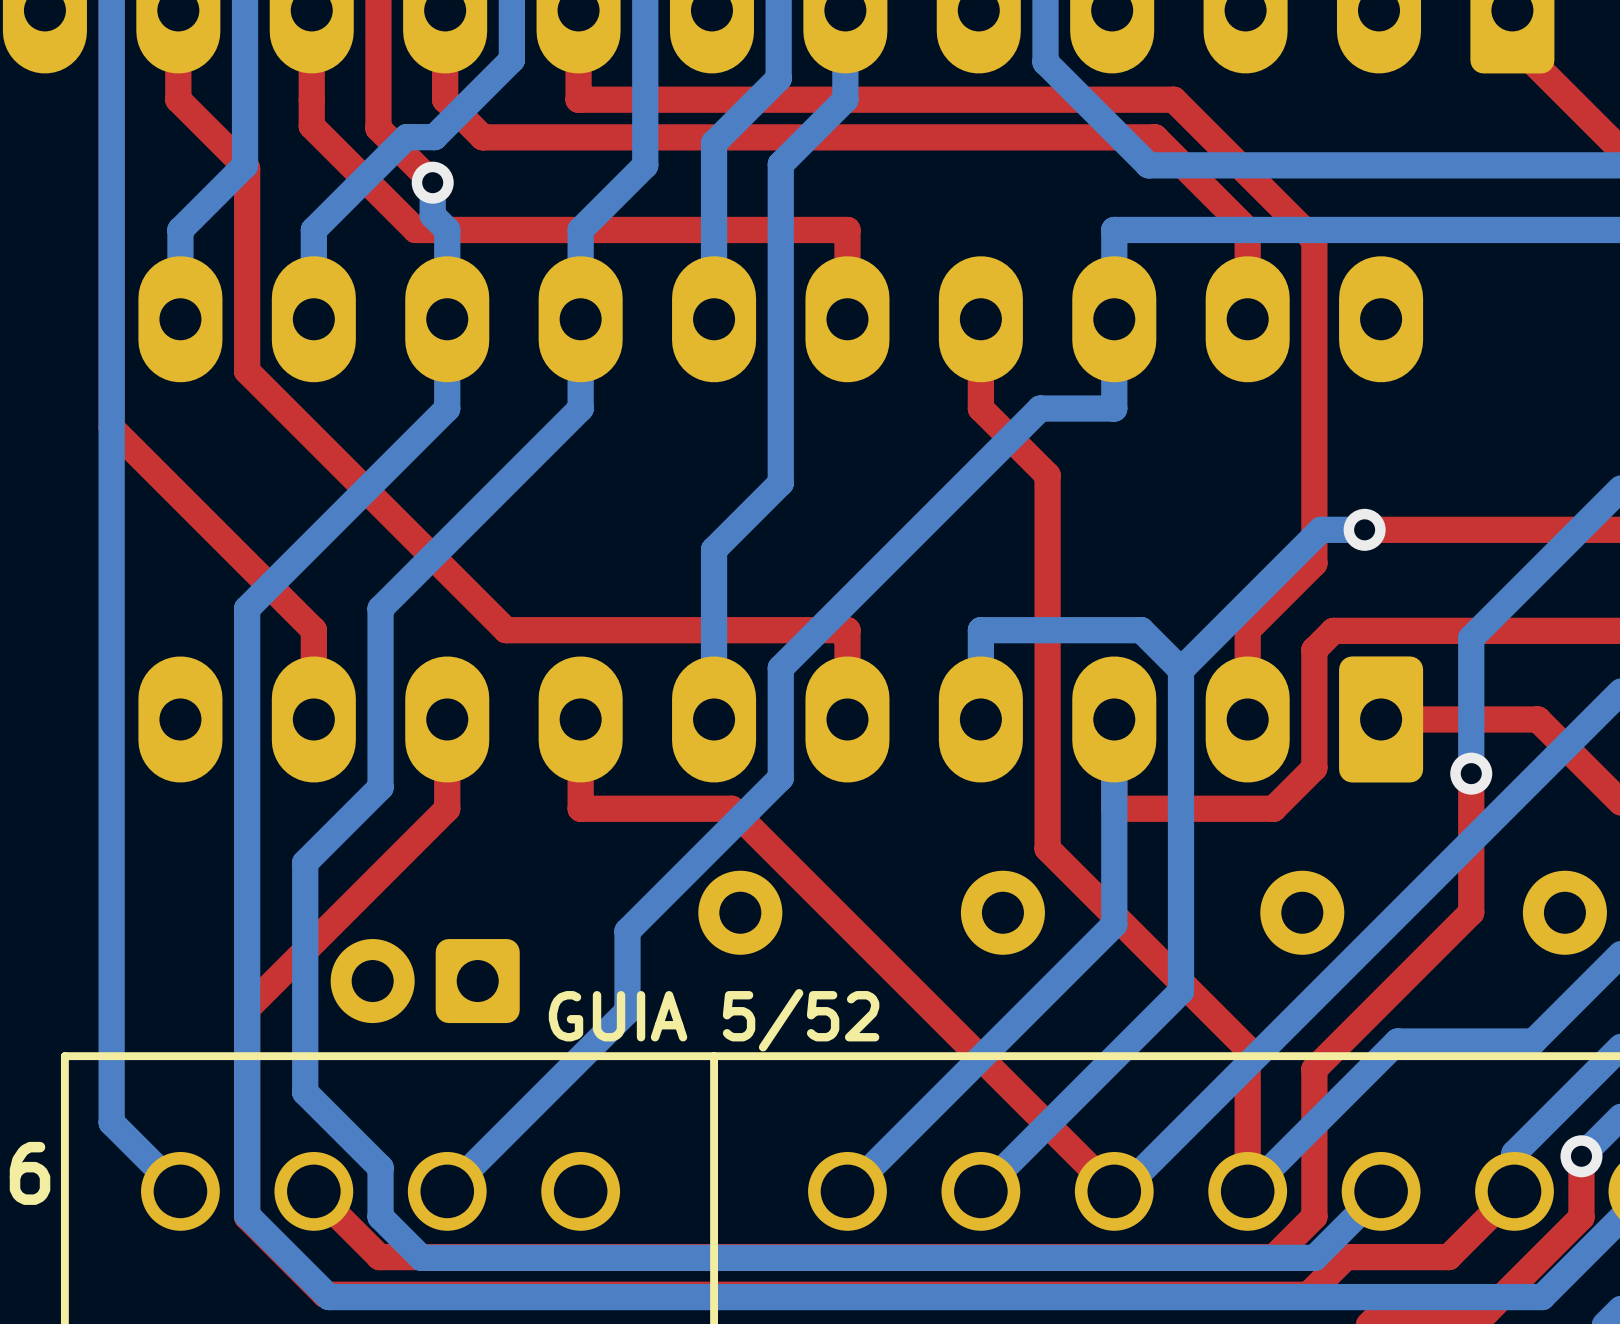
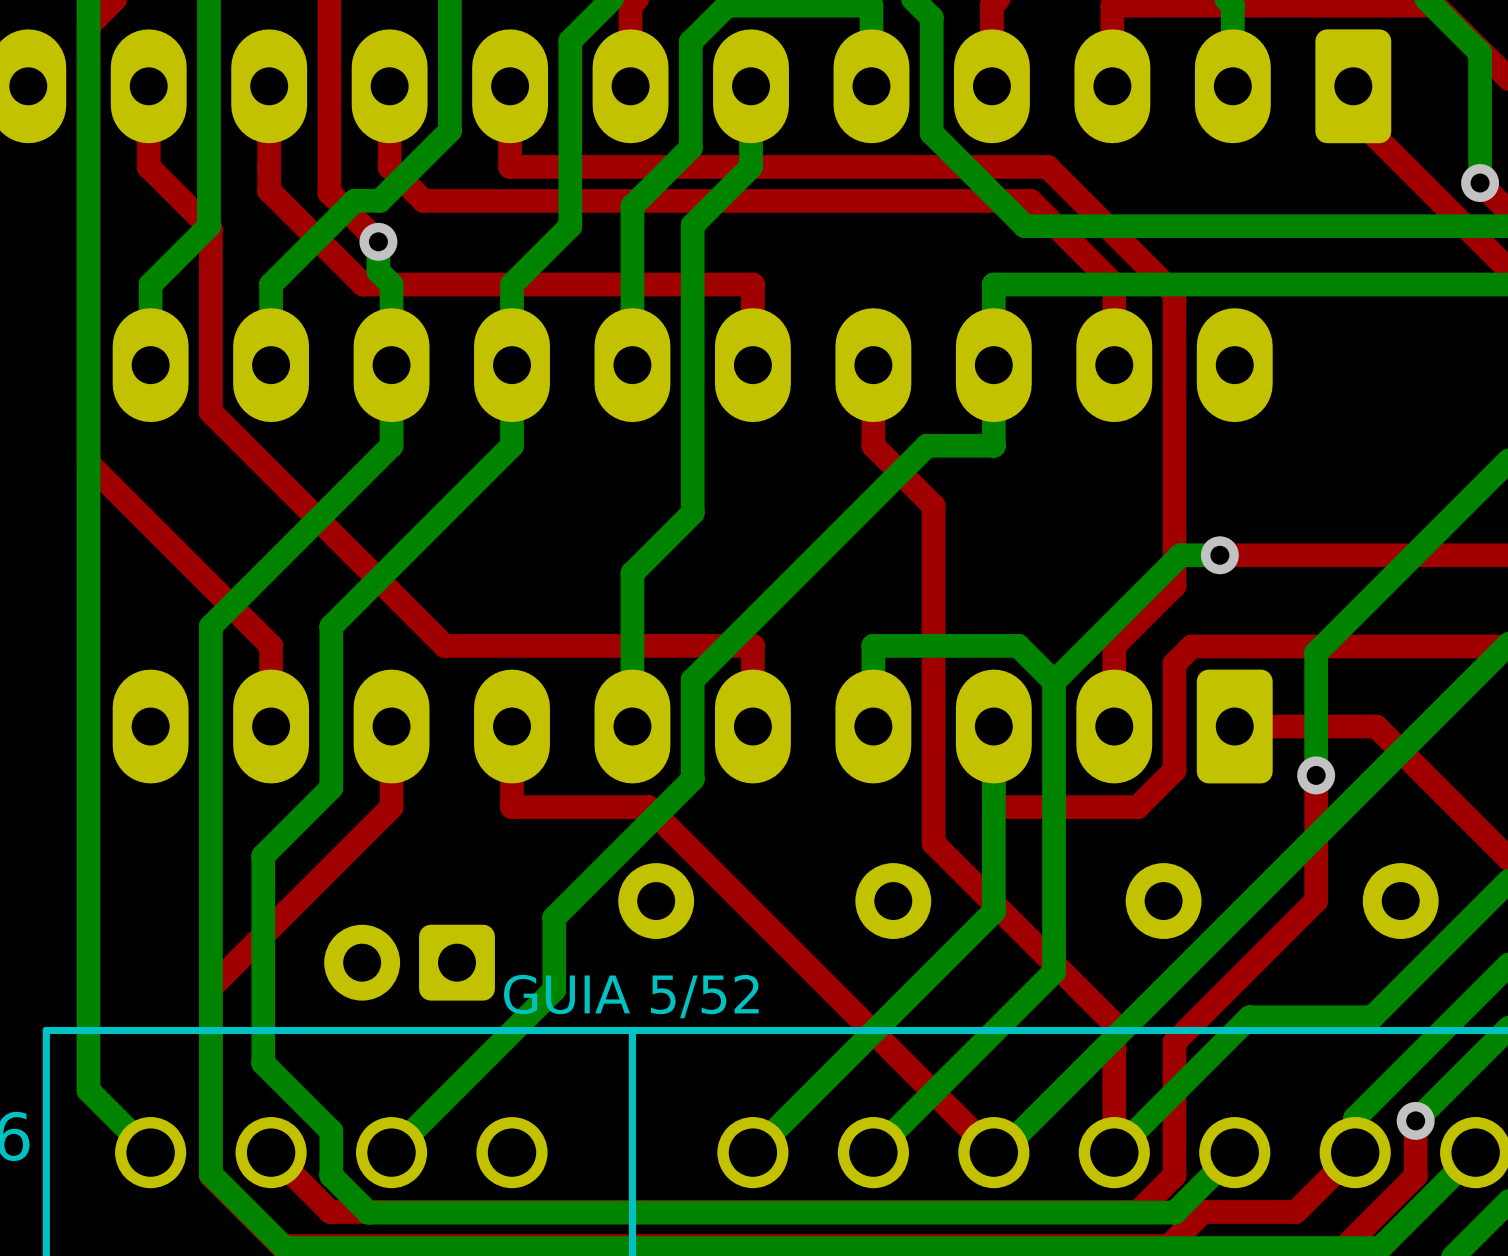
part position: (425, 981) -> (409, 962)

